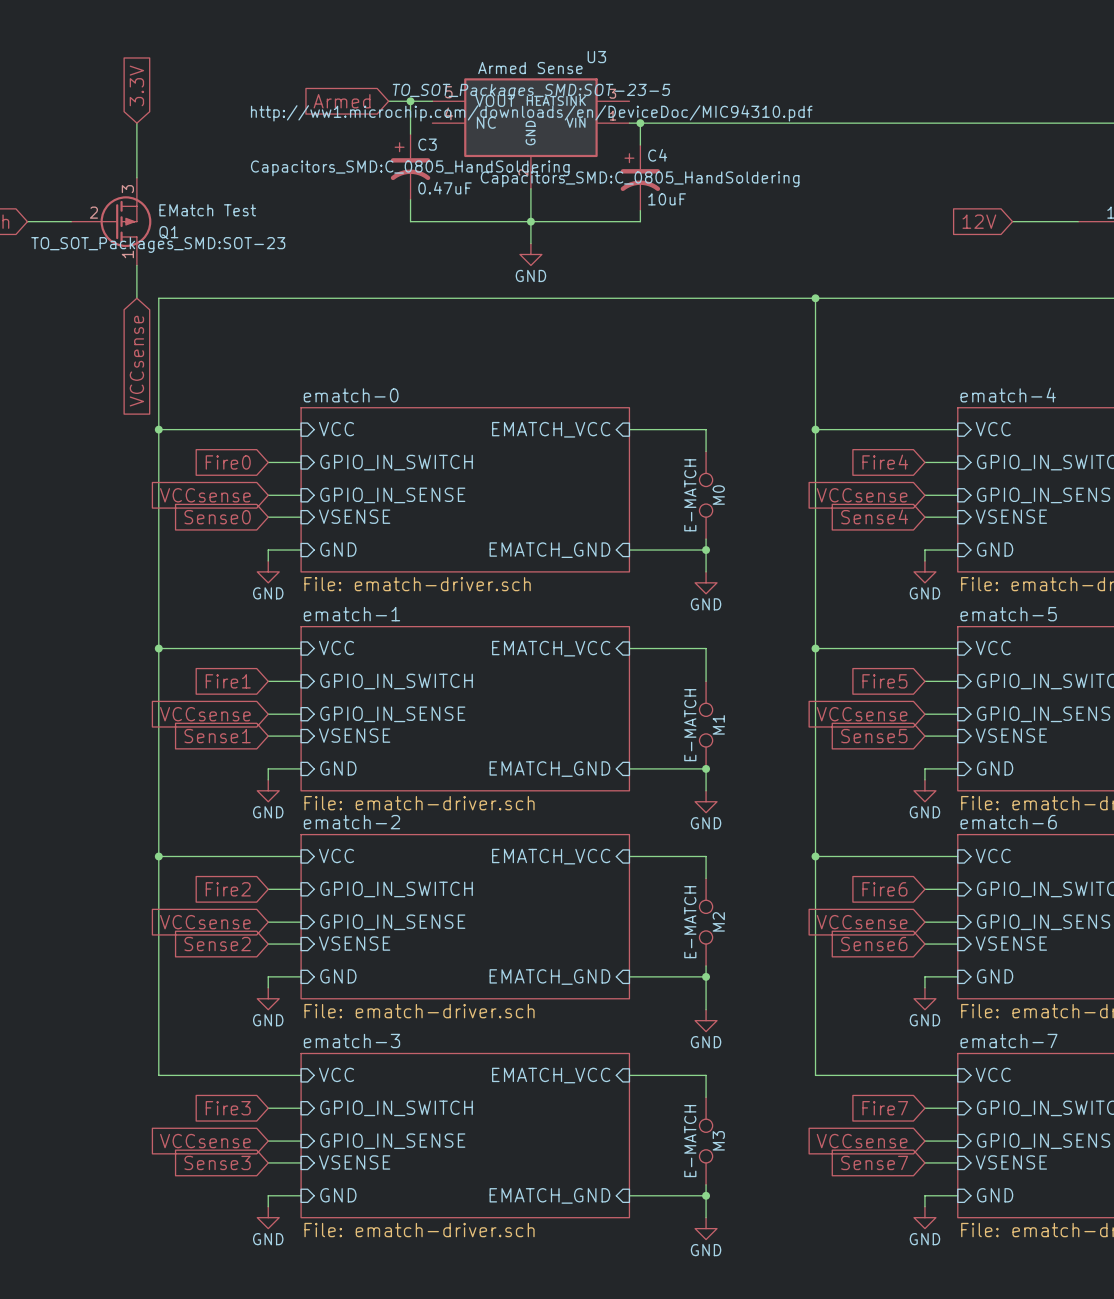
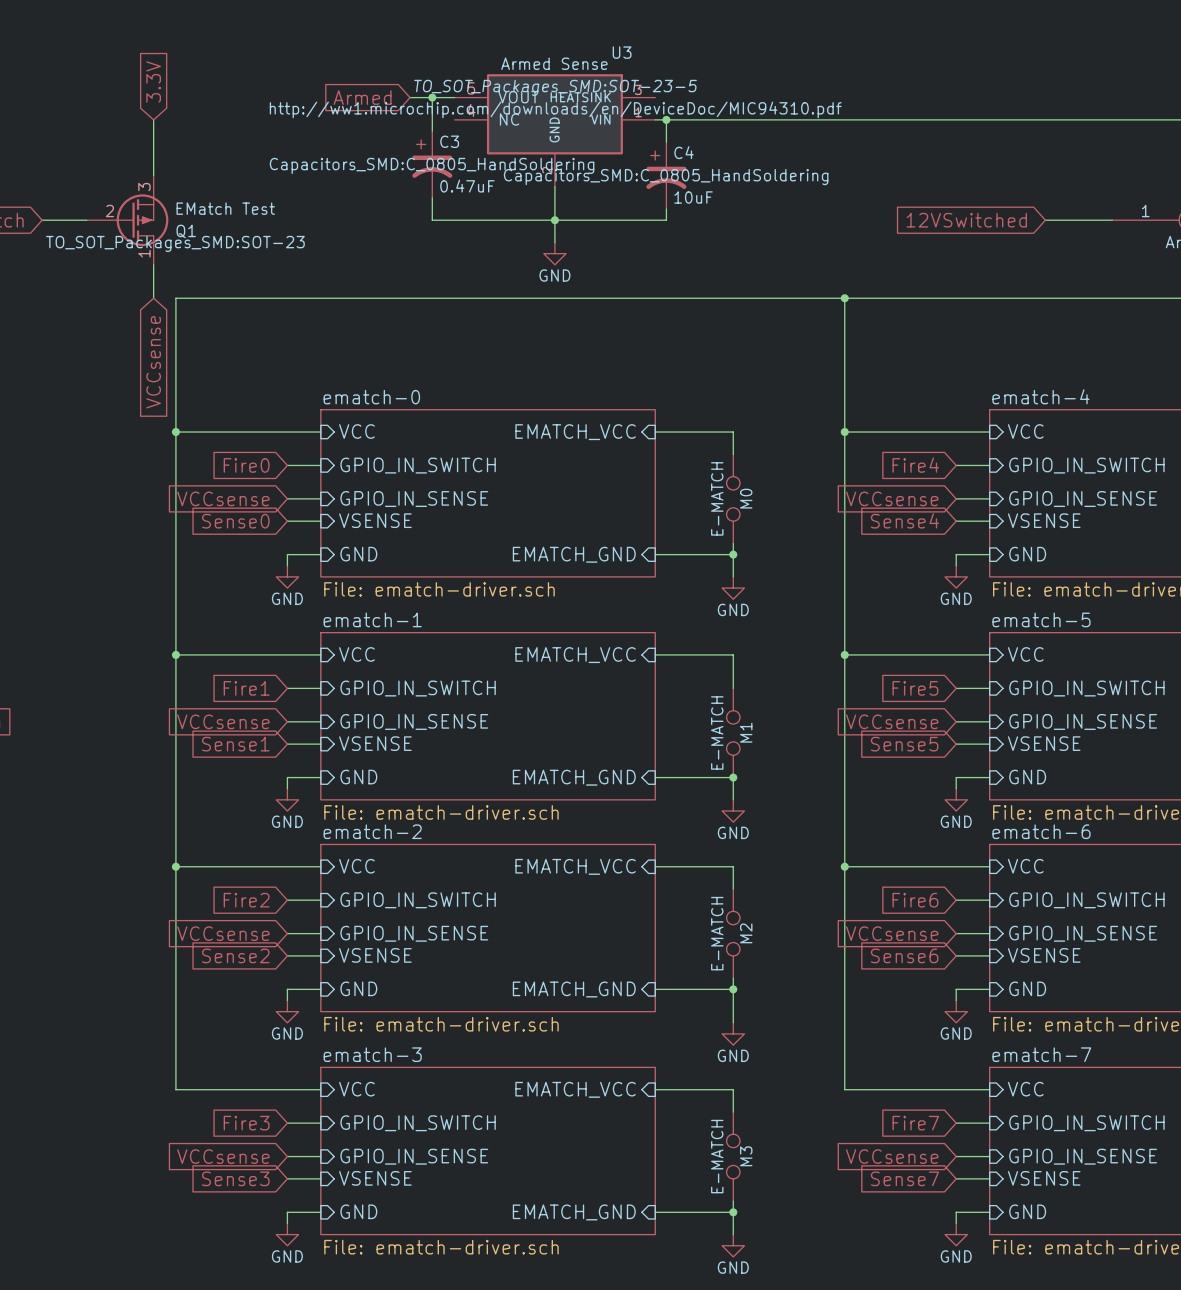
global label: 12V (979, 221) -> 12VSwitched (966, 220)

